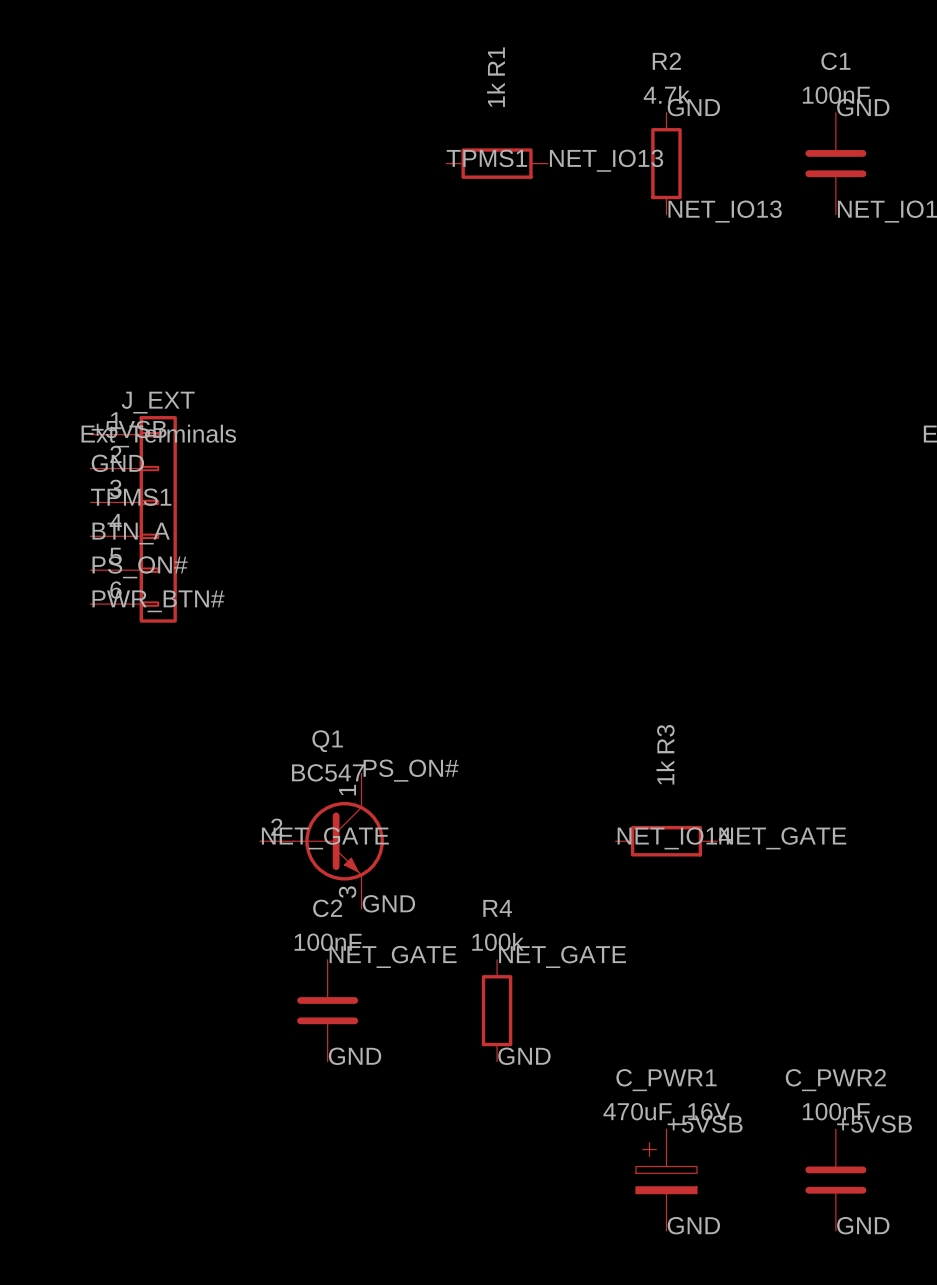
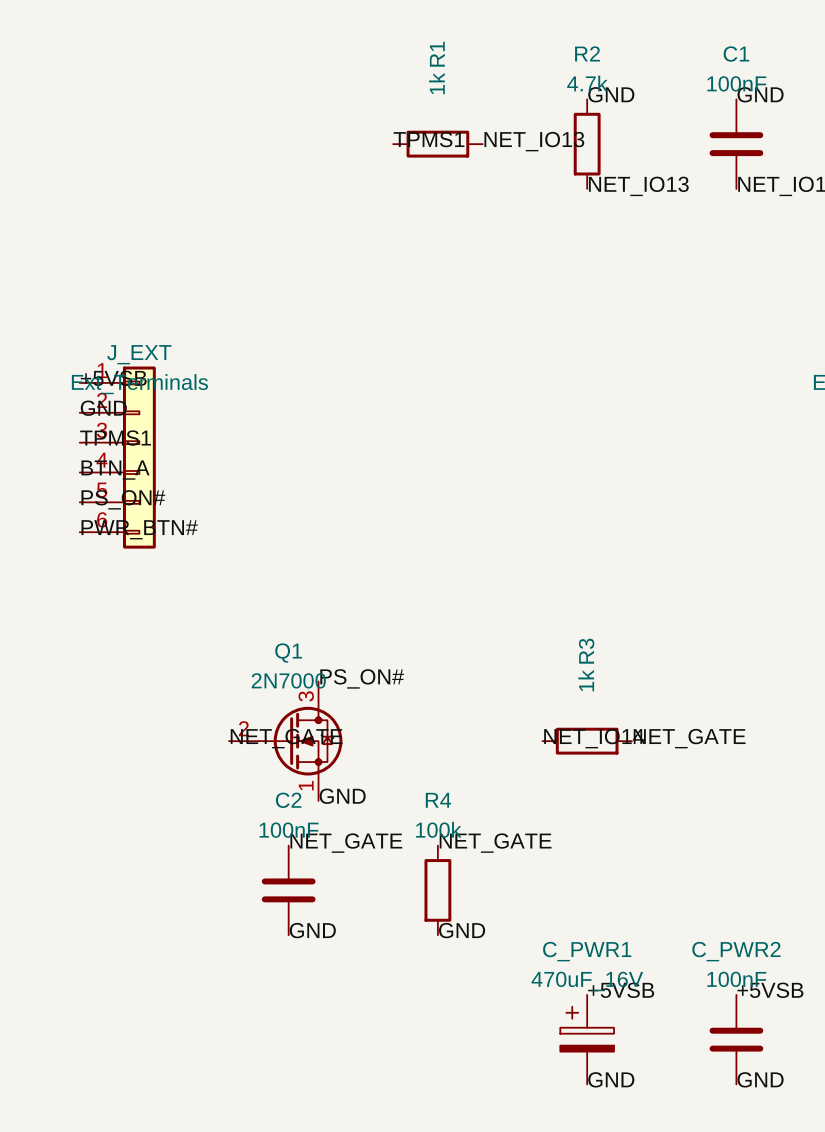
Q1 value: BC547 (328, 772) -> 2N7000 (288, 680)
Q1 symbol: [259, 773, 384, 910] -> [228, 681, 343, 801]

